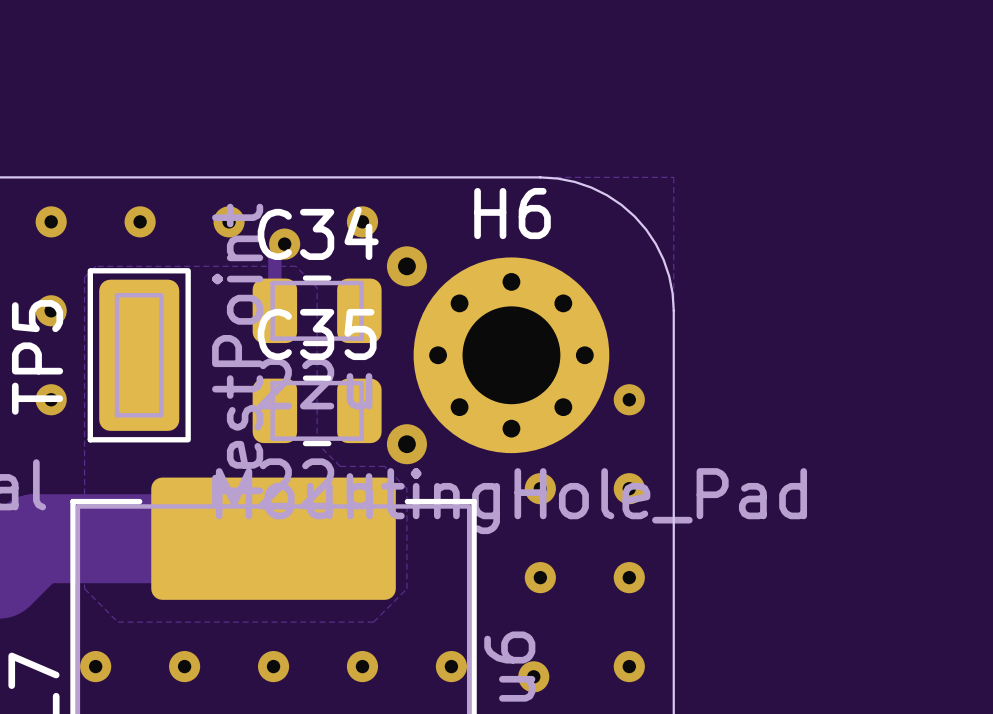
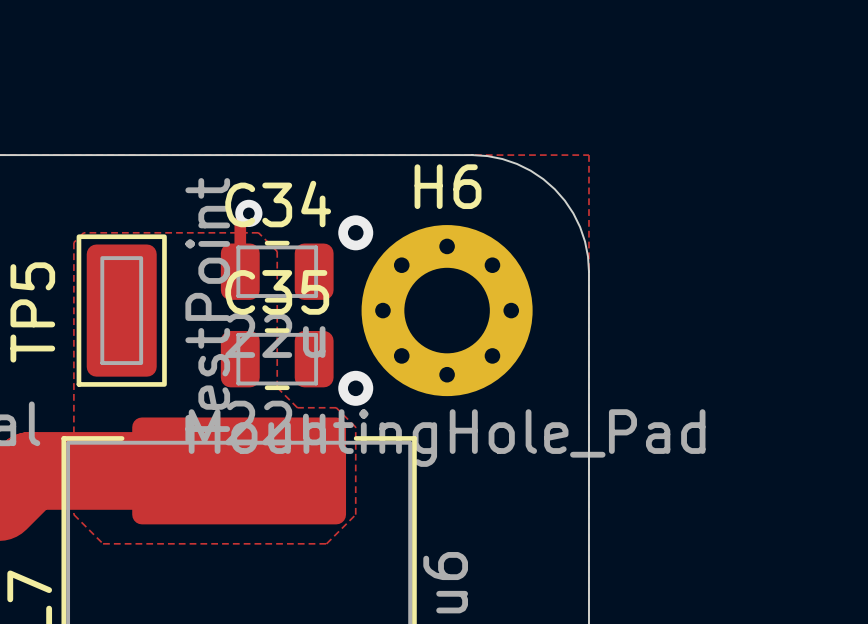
via: (51, 221) -> none
via: (140, 221) -> none
via: (229, 221) -> none
via: (362, 221) -> none
via: (51, 310) -> none
via: (51, 399) -> none
via: (629, 399) -> none
via: (540, 488) -> none
via: (629, 488) -> none
via: (540, 577) -> none
via: (629, 577) -> none
via: (95, 666) -> none
via: (184, 666) -> none
via: (273, 666) -> none
via: (362, 666) -> none
via: (451, 666) -> none
via: (629, 666) -> none
via: (533, 676) -> none

